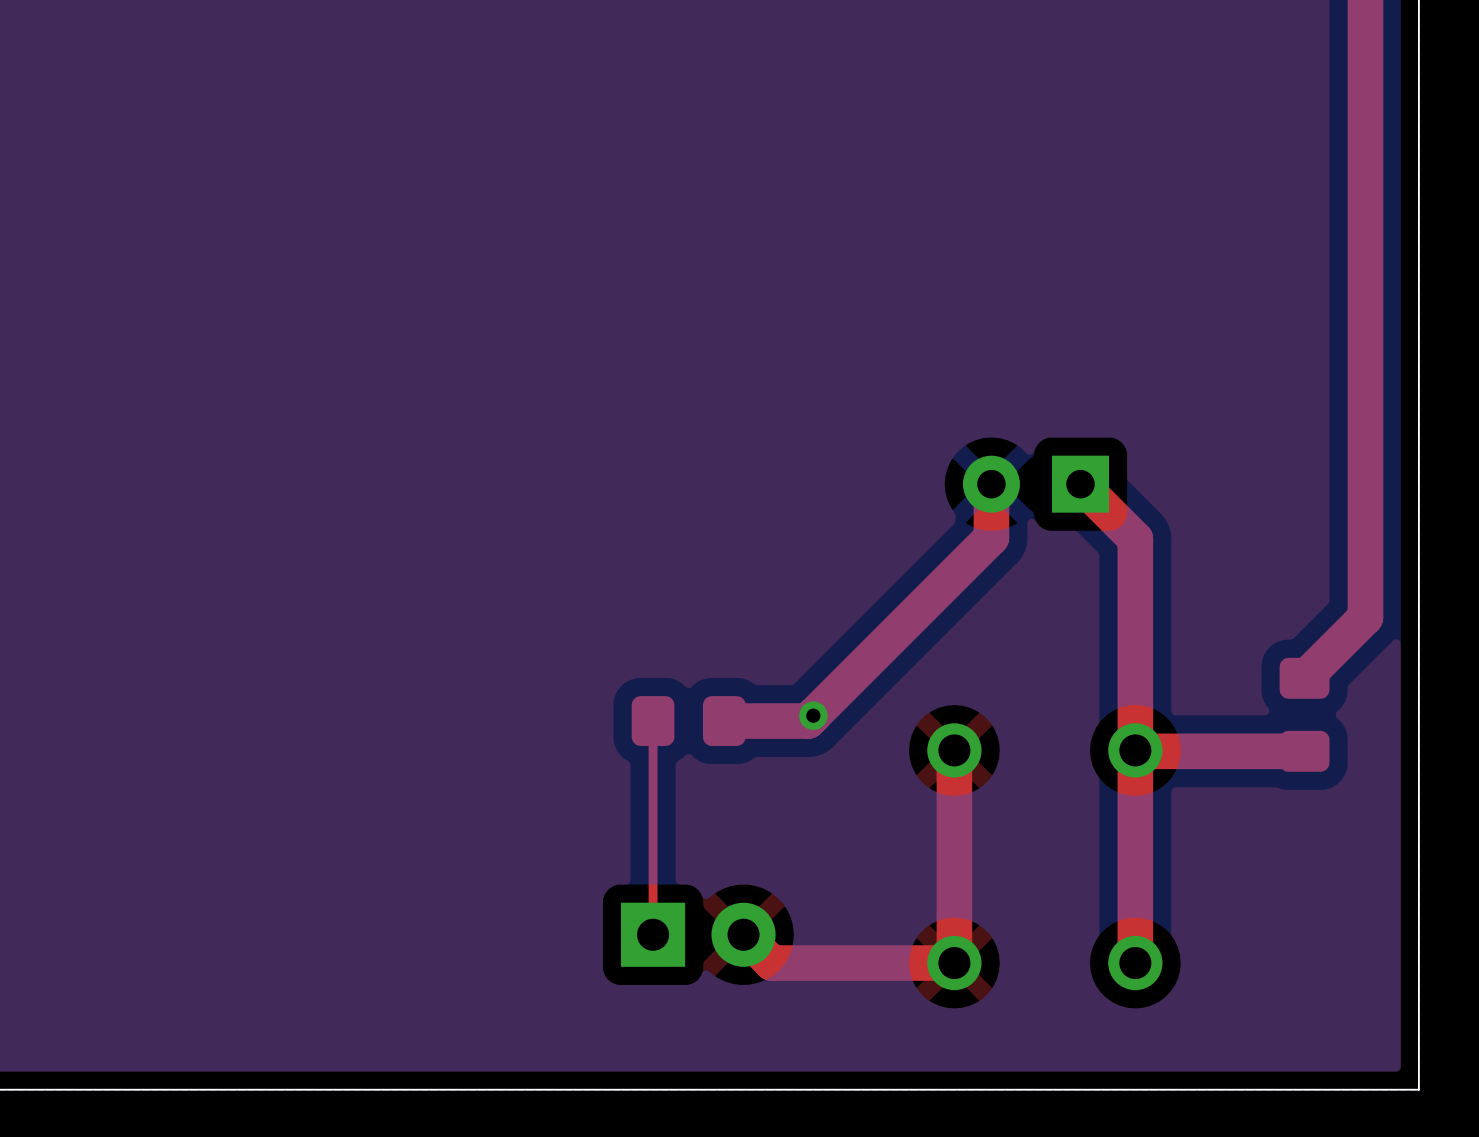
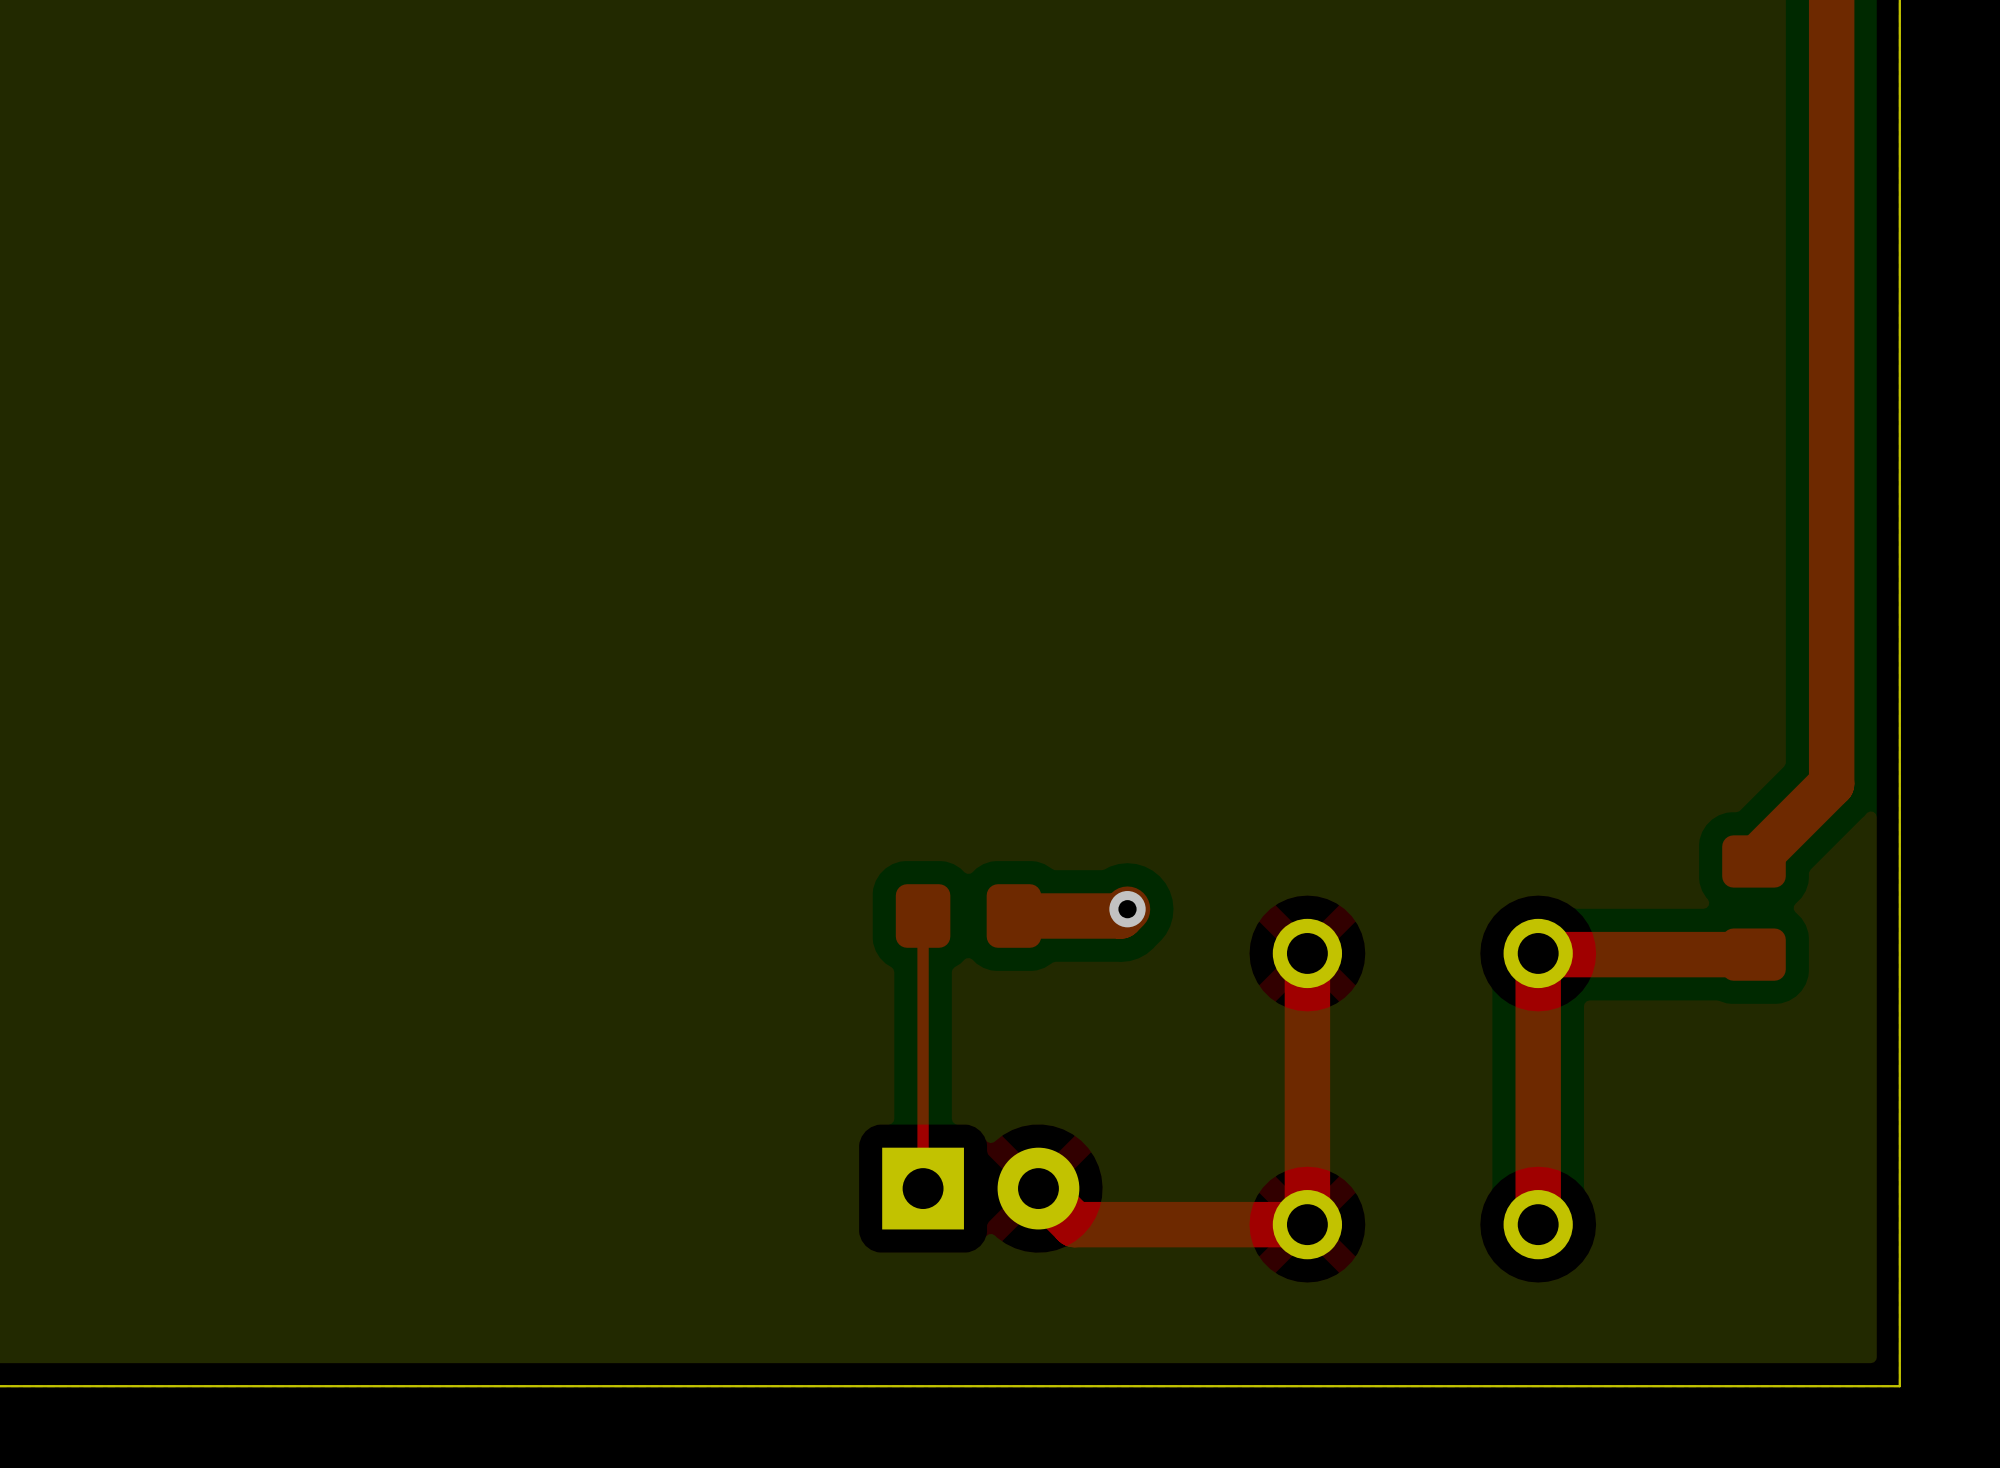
top track: (991, 484) (991, 537) (813, 715) -> none
part: (1035, 484) -> none
top track: (1080, 484) (1135, 539) (1135, 750) -> none

